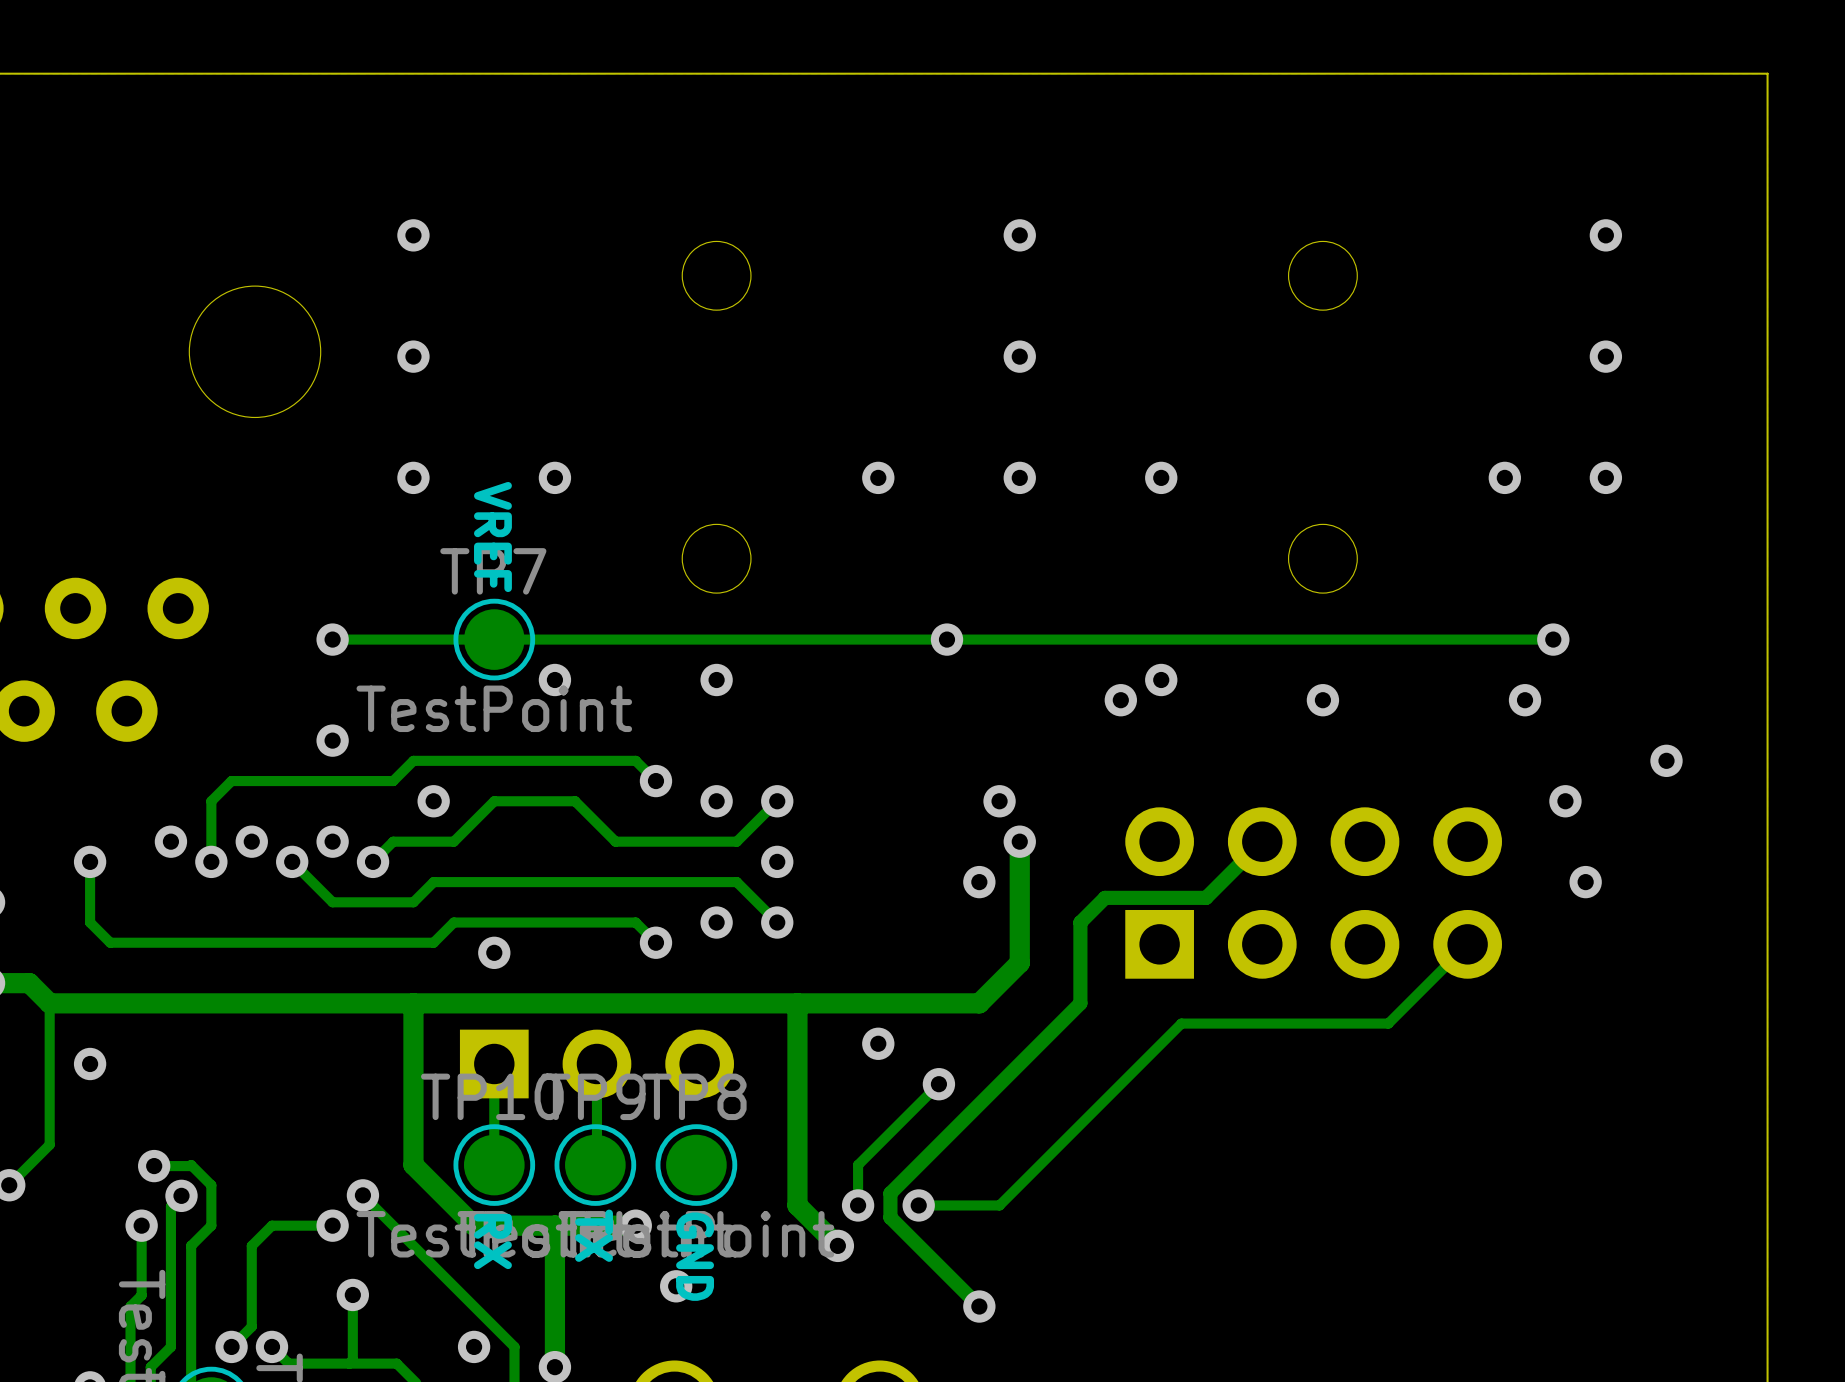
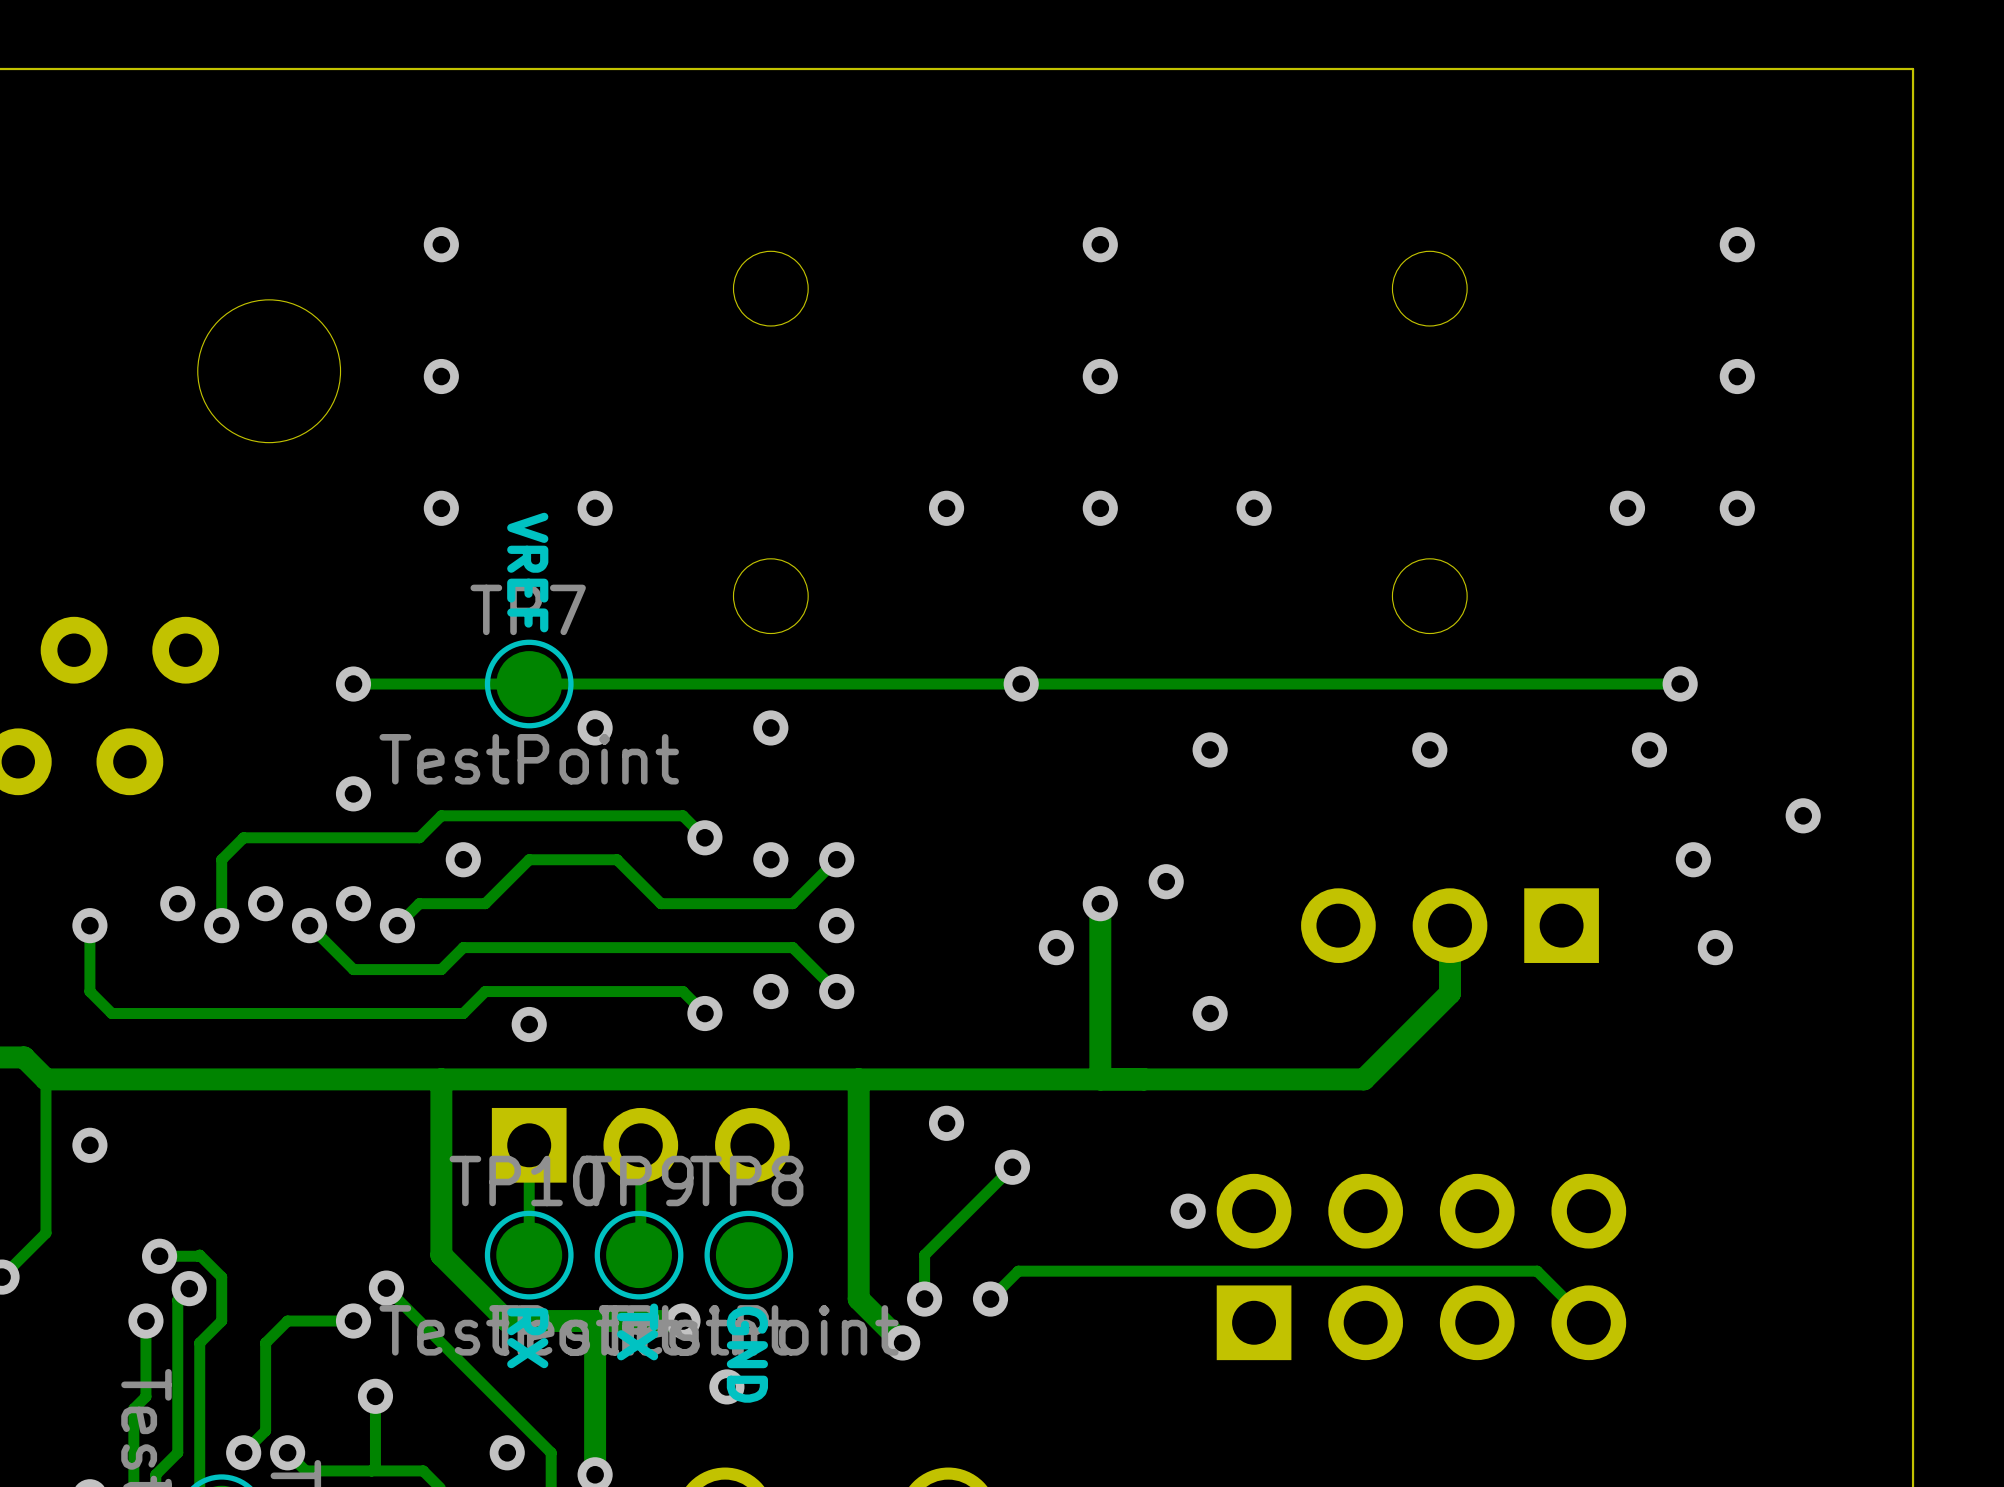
via: (1161, 679) -> none
via: (999, 801) -> none
via: none -> (1166, 881)
track: (1262, 841) (1206, 897) (1105, 897) (1080, 922) (1080, 1003) (890, 1193) (890, 1217) (979, 1306) -> none
track: none -> (1450, 925) (1450, 993) (1363, 1079) (1056, 1079)
part: none -> (1450, 925)
part position: (1313, 893) -> (1421, 1266)
via: none -> (1210, 1013)
track: (1467, 944) (1388, 1023) (1181, 1023) (999, 1205) (918, 1205) -> (1588, 1322) (1537, 1271) (1018, 1271) (990, 1299)
track: (1019, 962) (979, 1003) -> (1100, 1035) (1100, 1079)
via: none -> (1188, 1211)
via: (979, 1306) -> none

